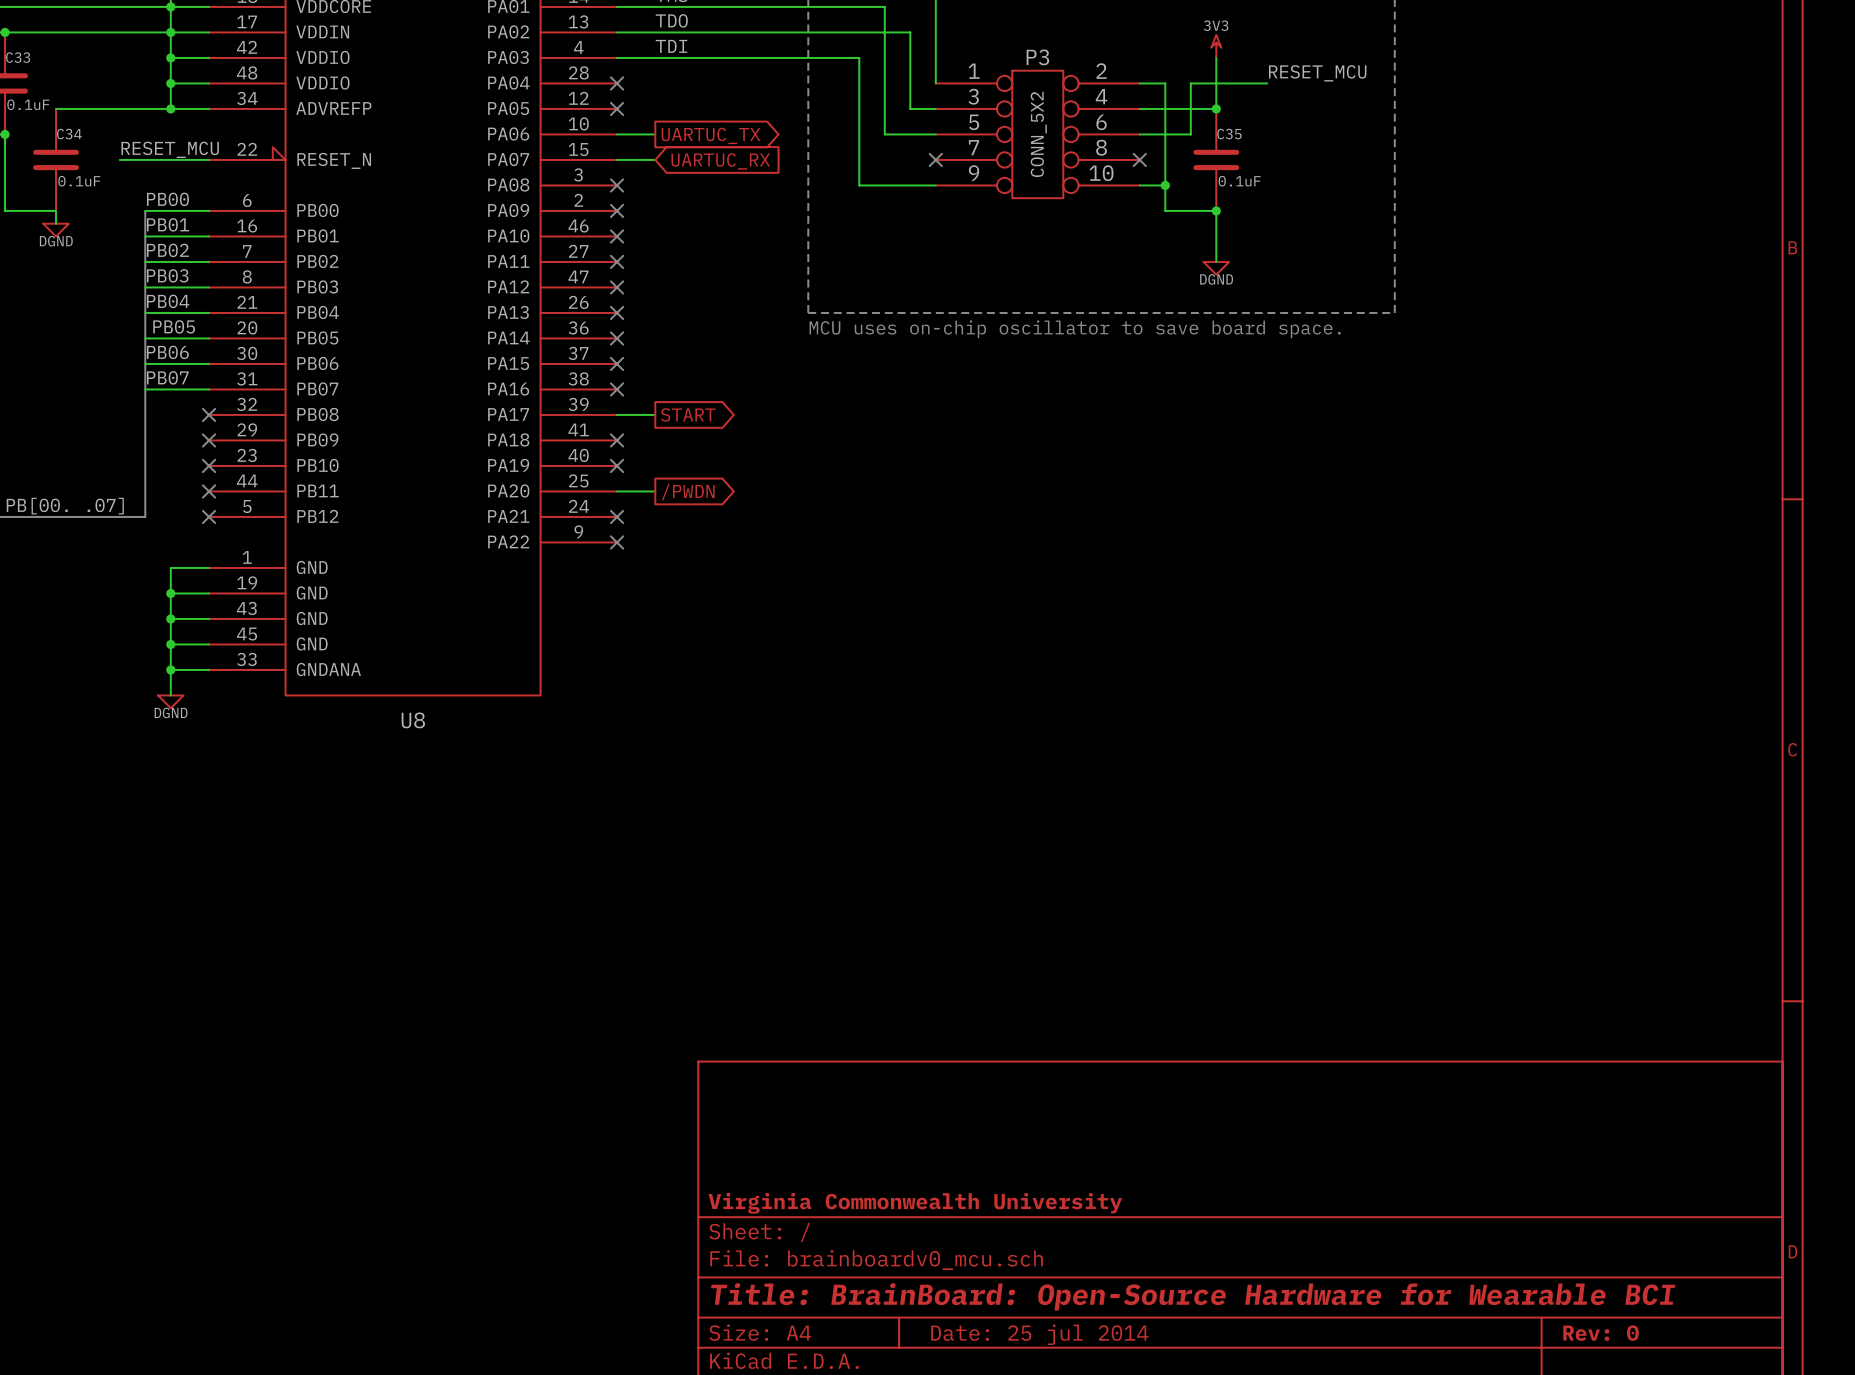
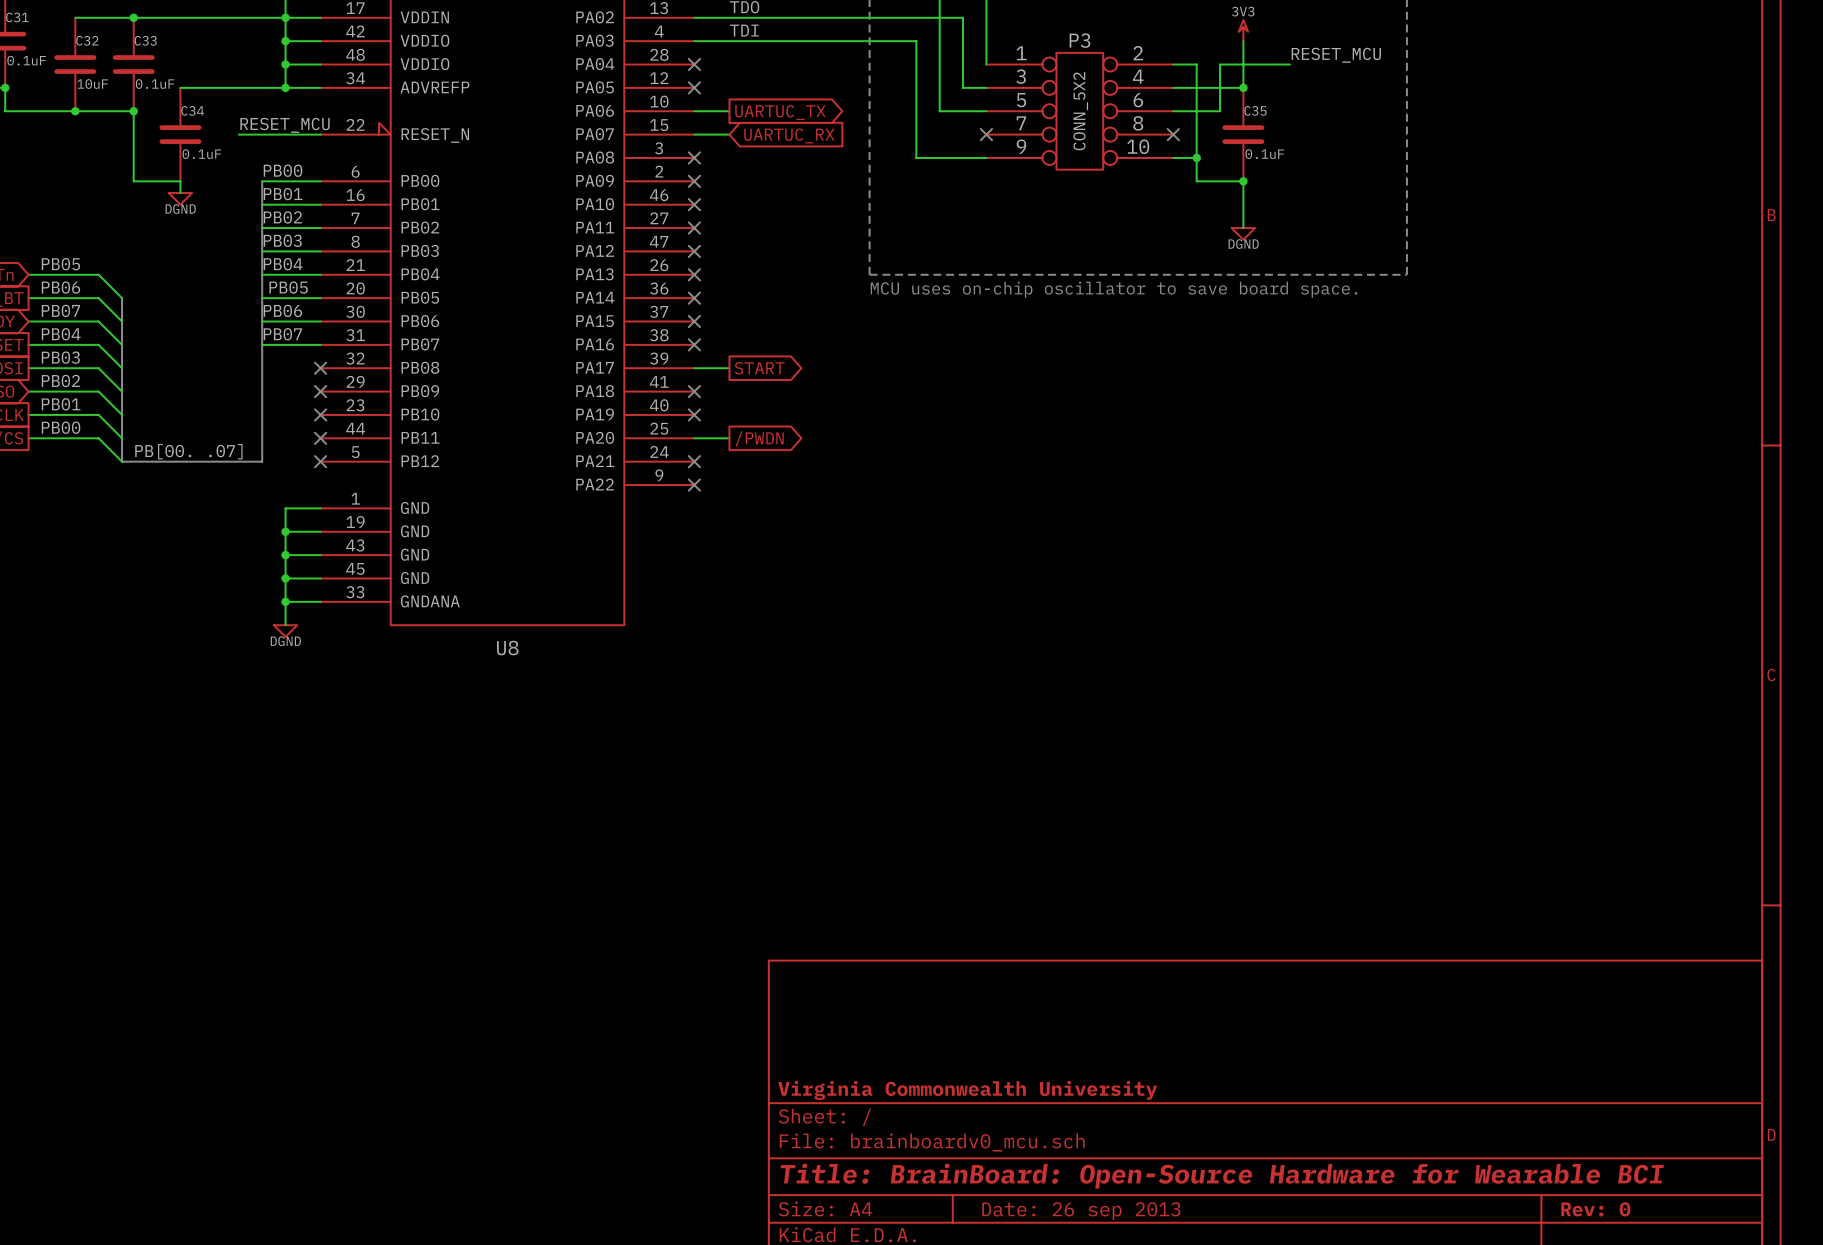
title block: Date: 25 jul 2014 (1039, 1334) -> Date: 26 sep 2013 (1081, 1211)

